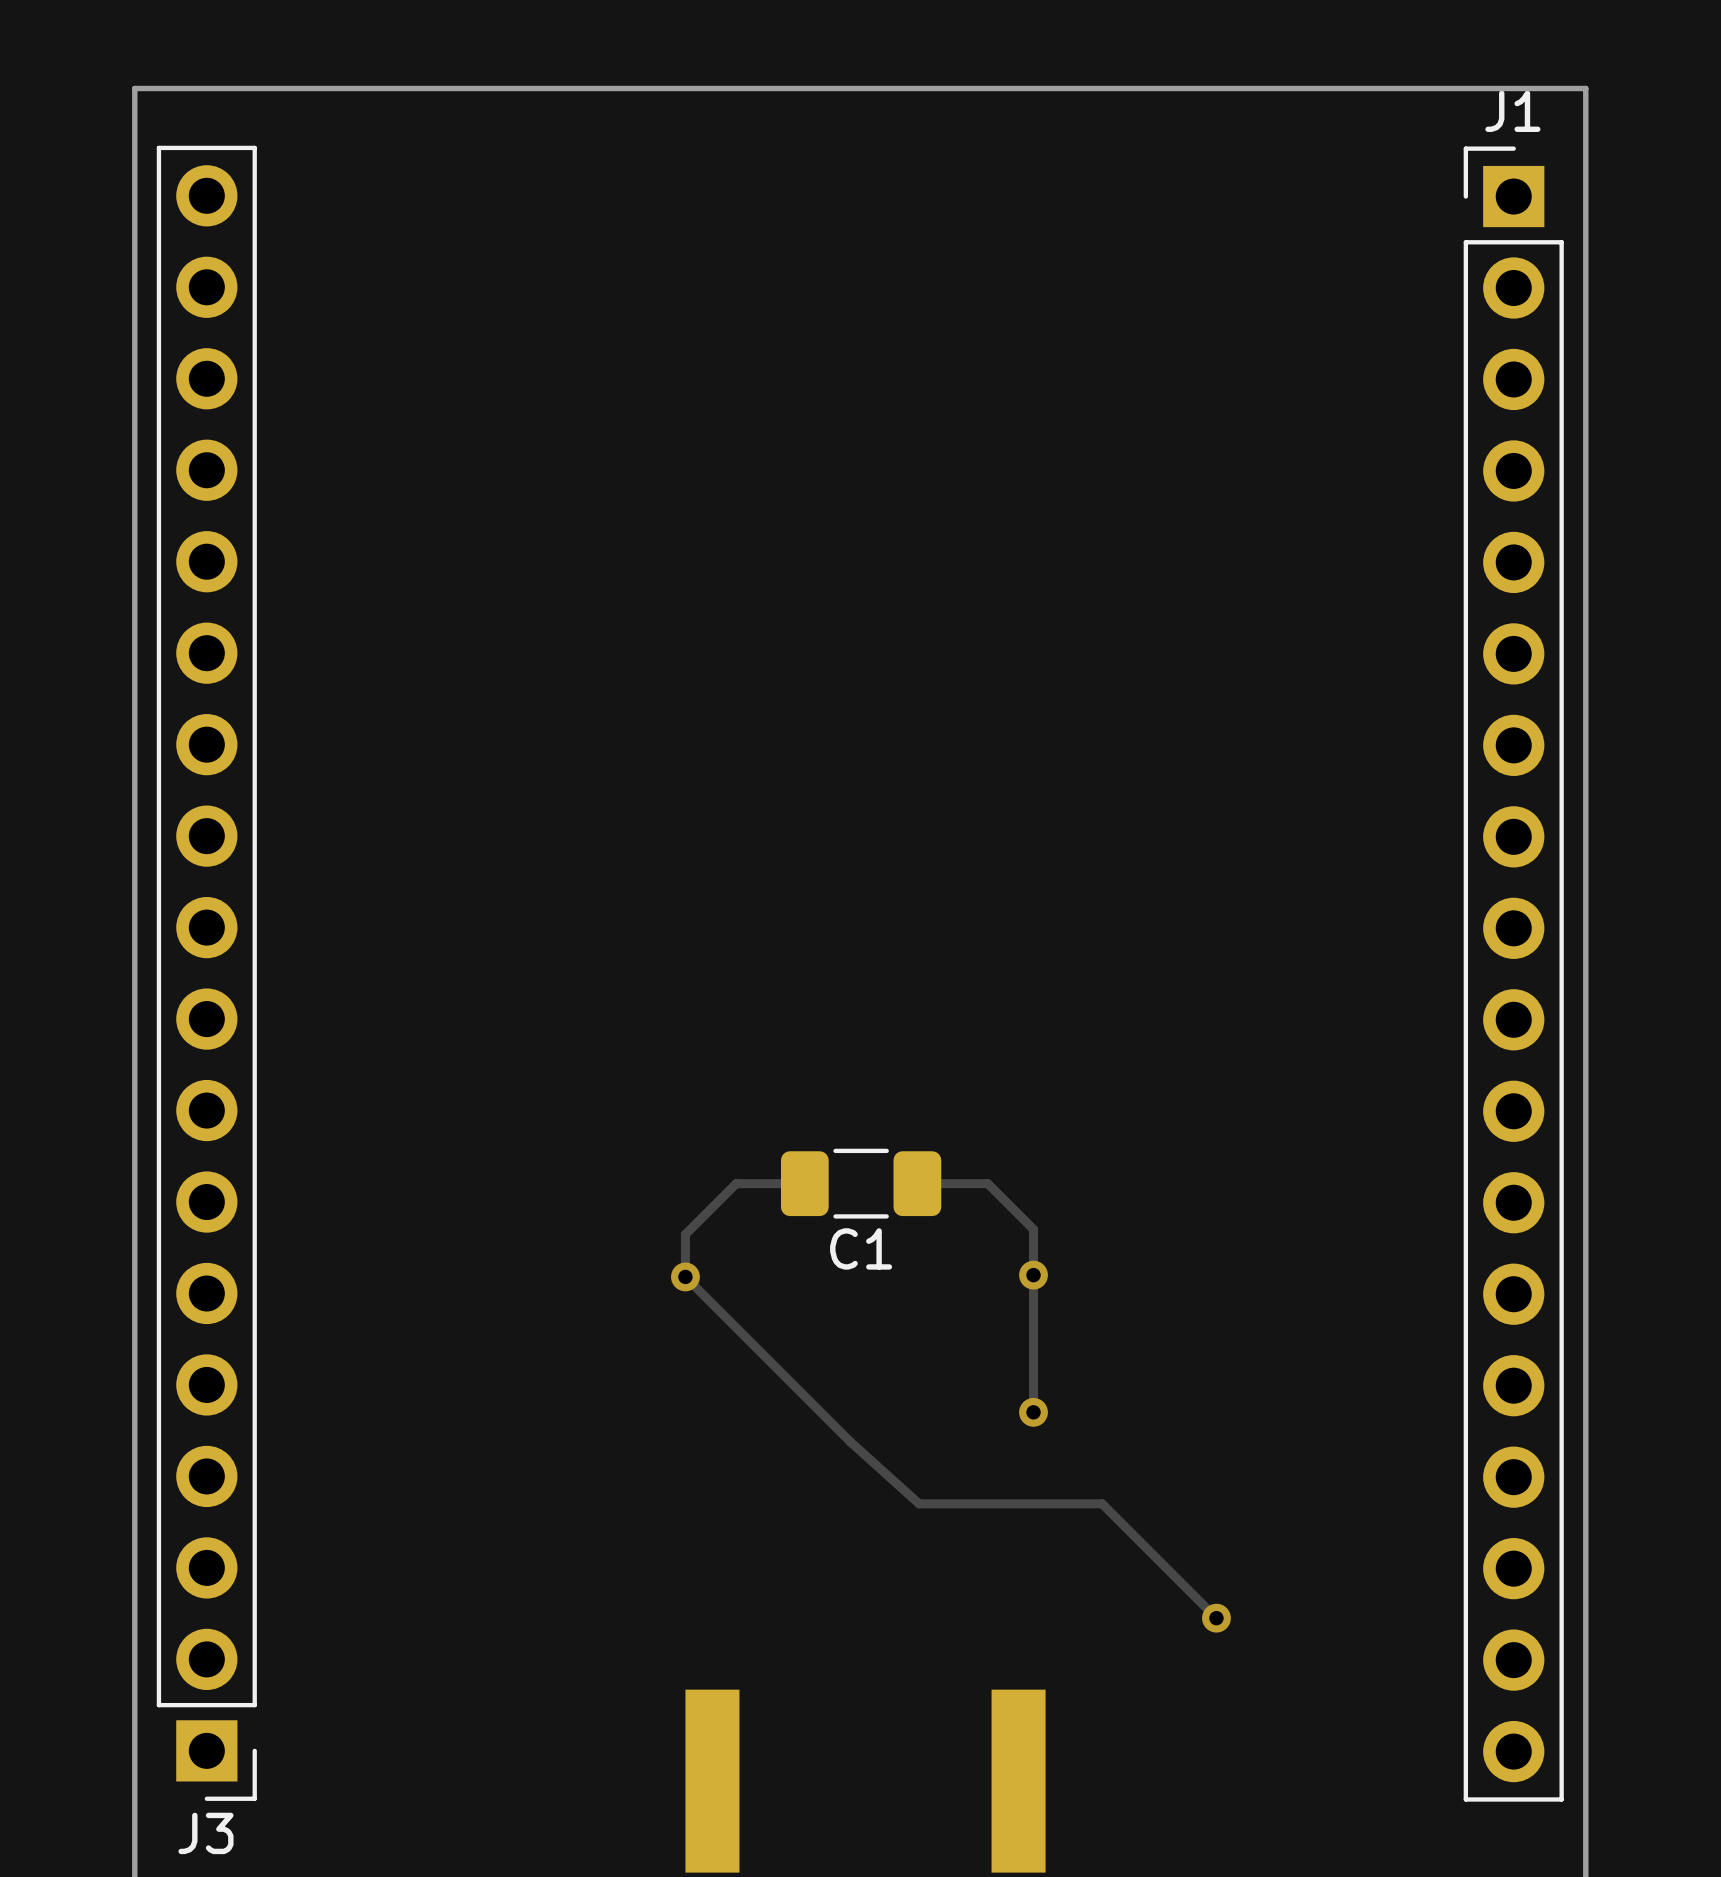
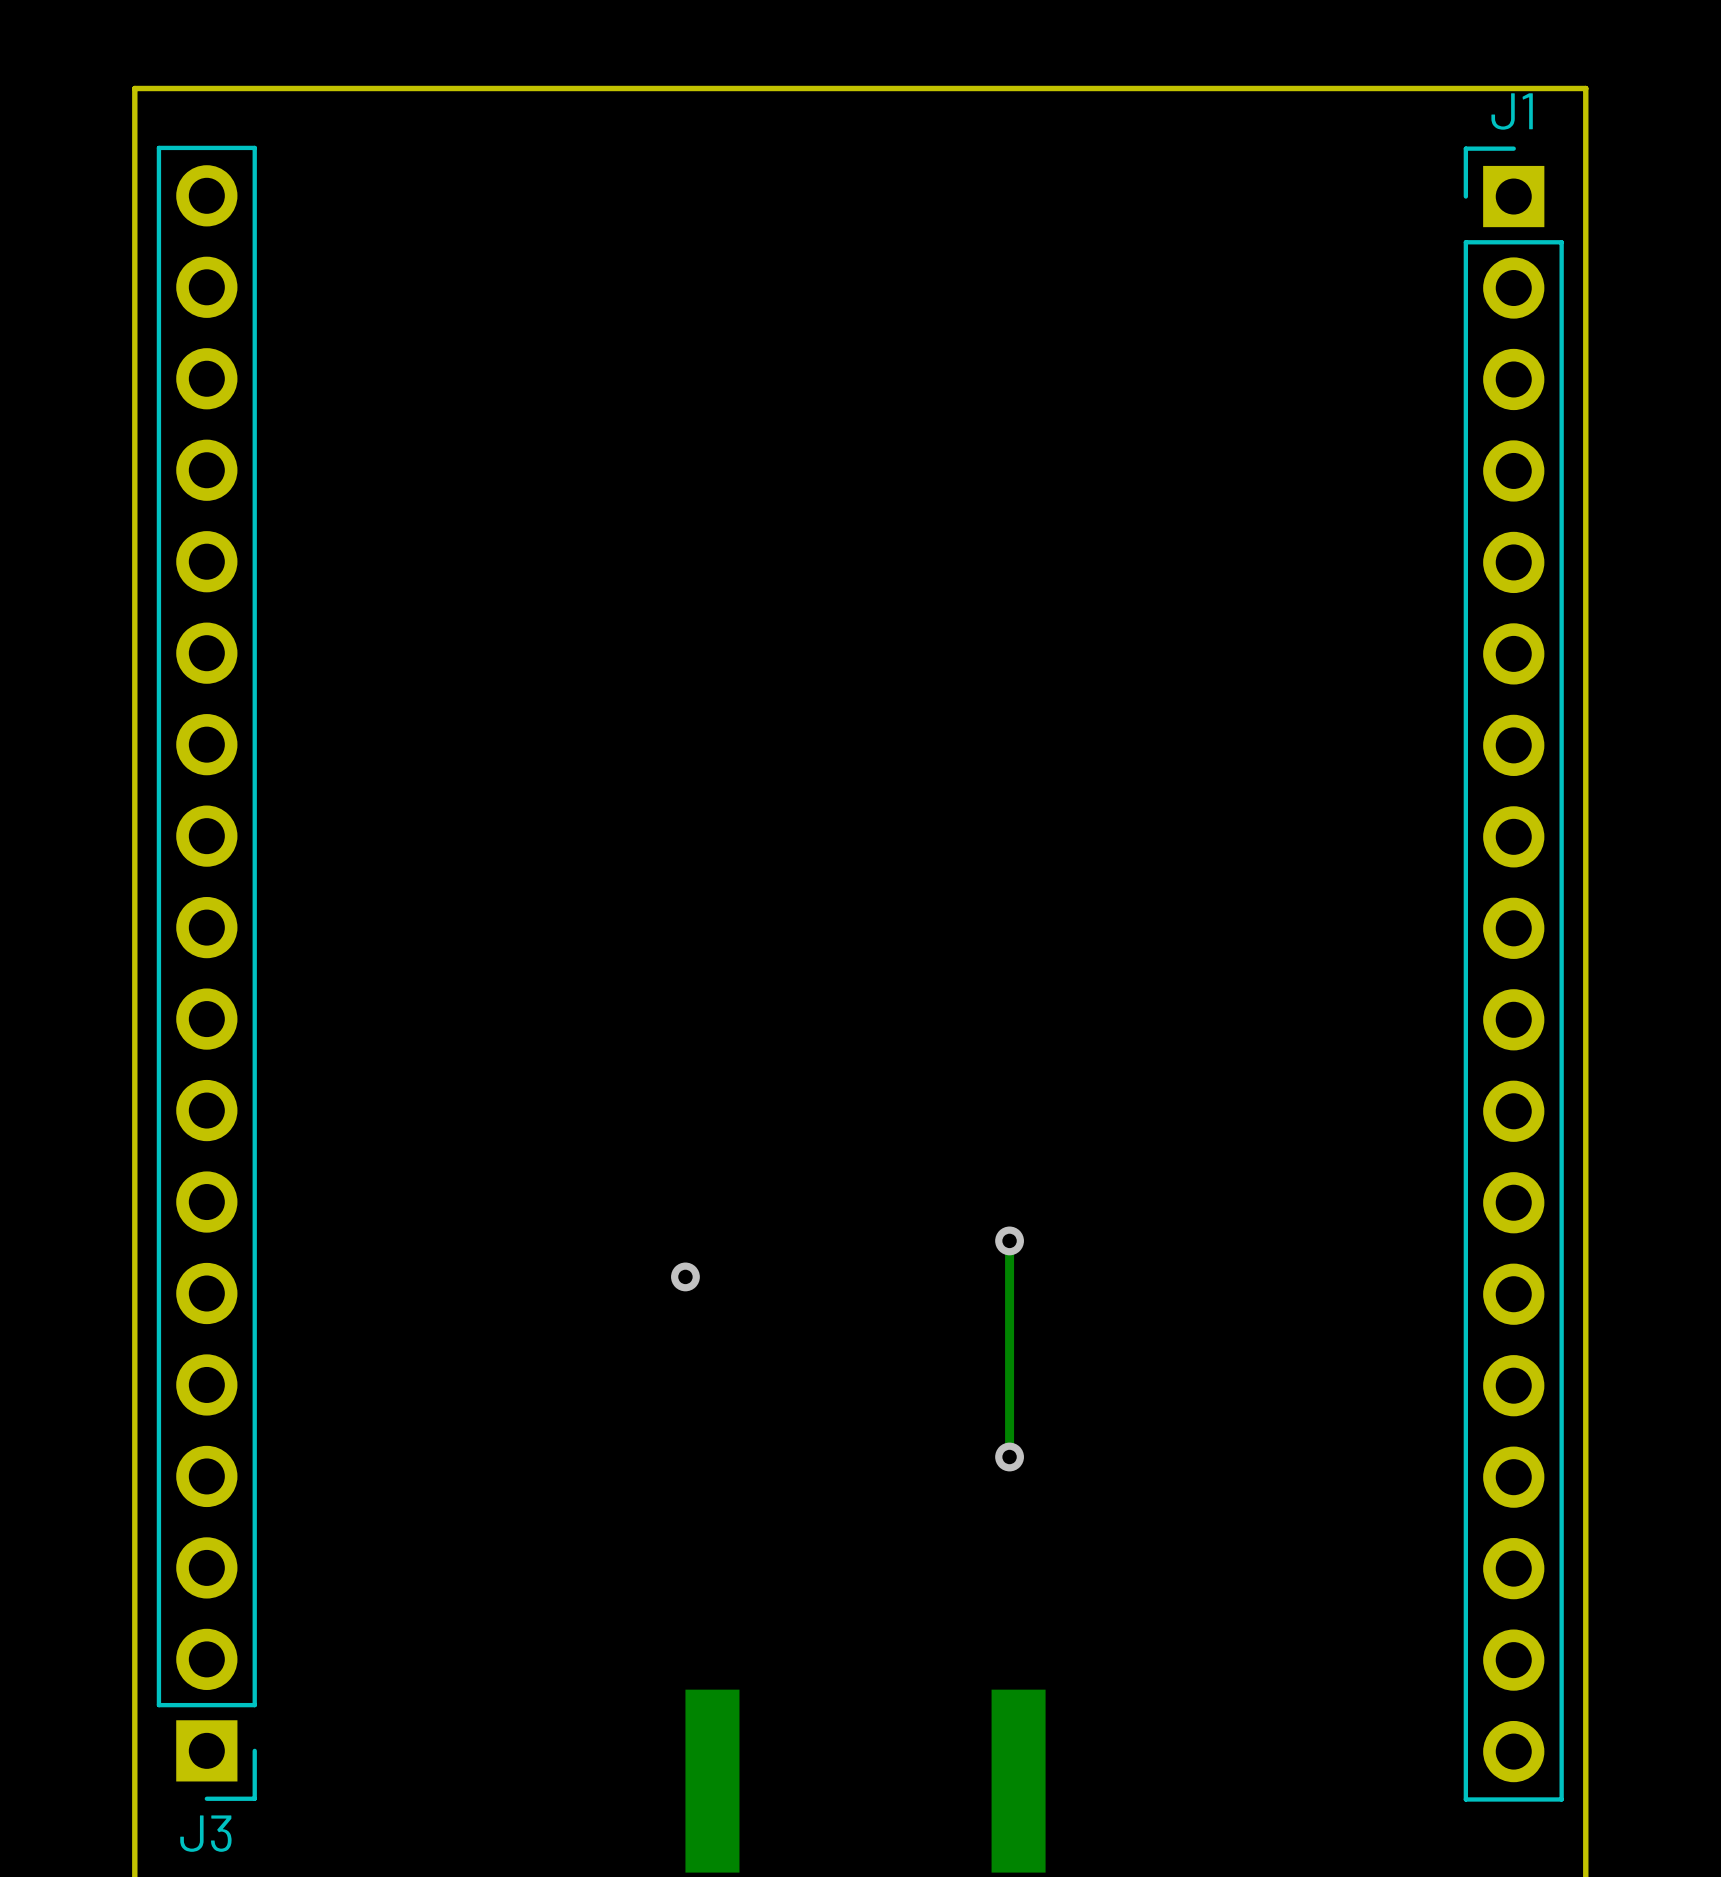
track: (804, 1183) (736, 1183) (685, 1234) (685, 1276) (850, 1442) (919, 1503) (1102, 1503) (1216, 1618) -> none
C1: (861, 1183) -> none
track: (917, 1183) (987, 1183) (1033, 1229) (1033, 1412) -> none
track: none -> (1009, 1240) (1009, 1457)
via position: (1033, 1275) -> (1009, 1240)
via position: (1033, 1412) -> (1009, 1457)
via: (1216, 1618) -> none

